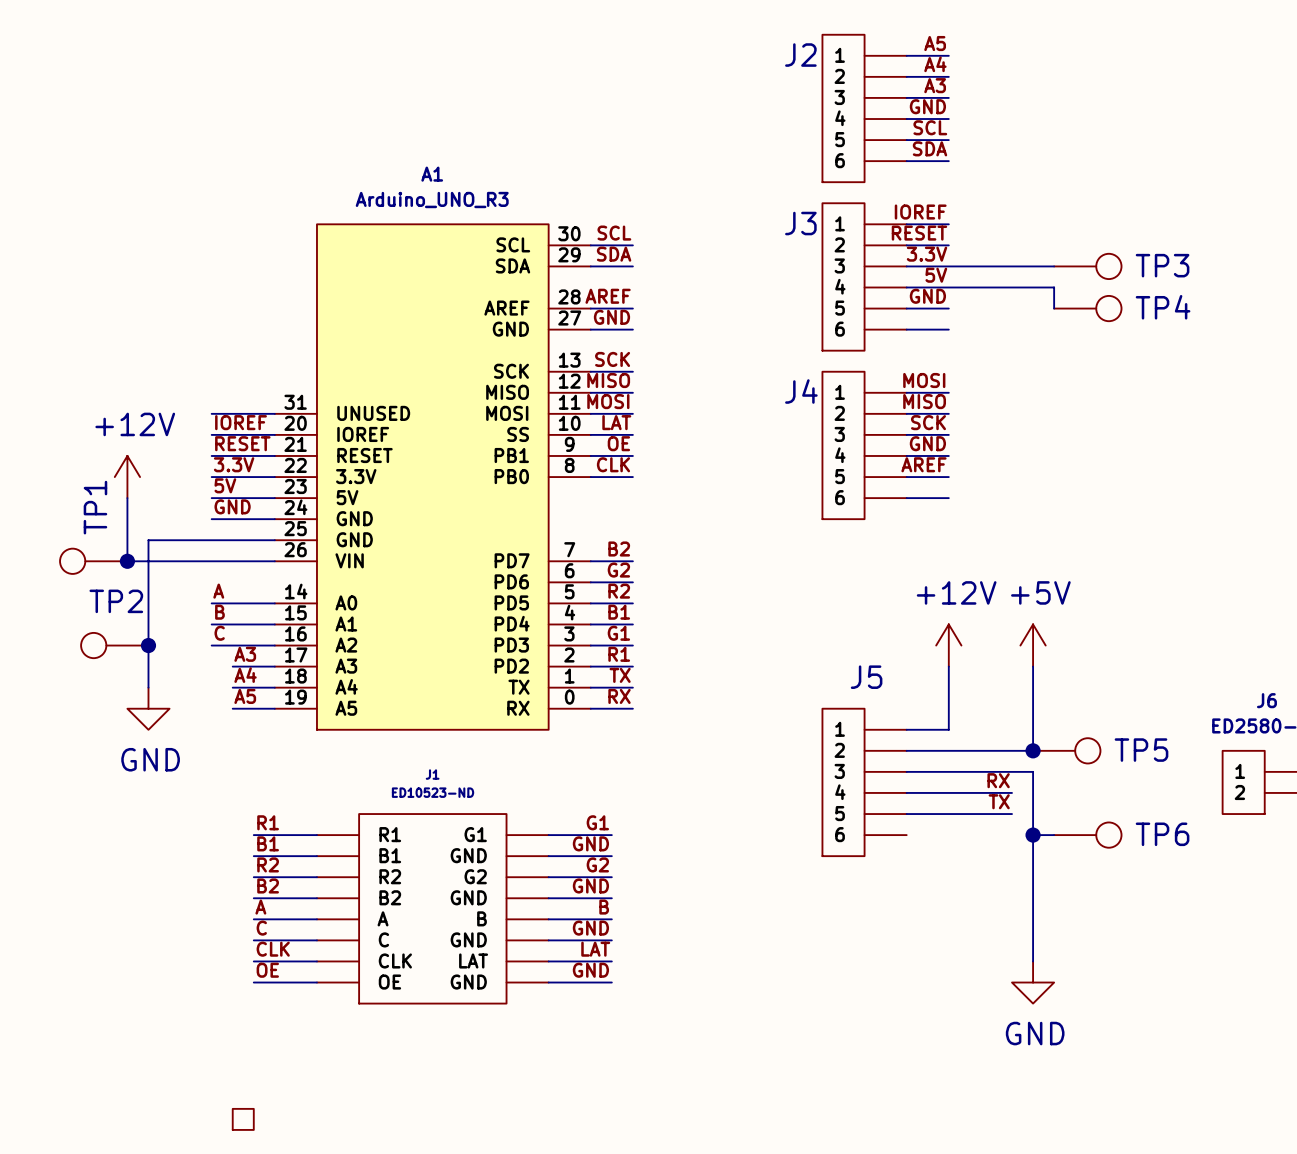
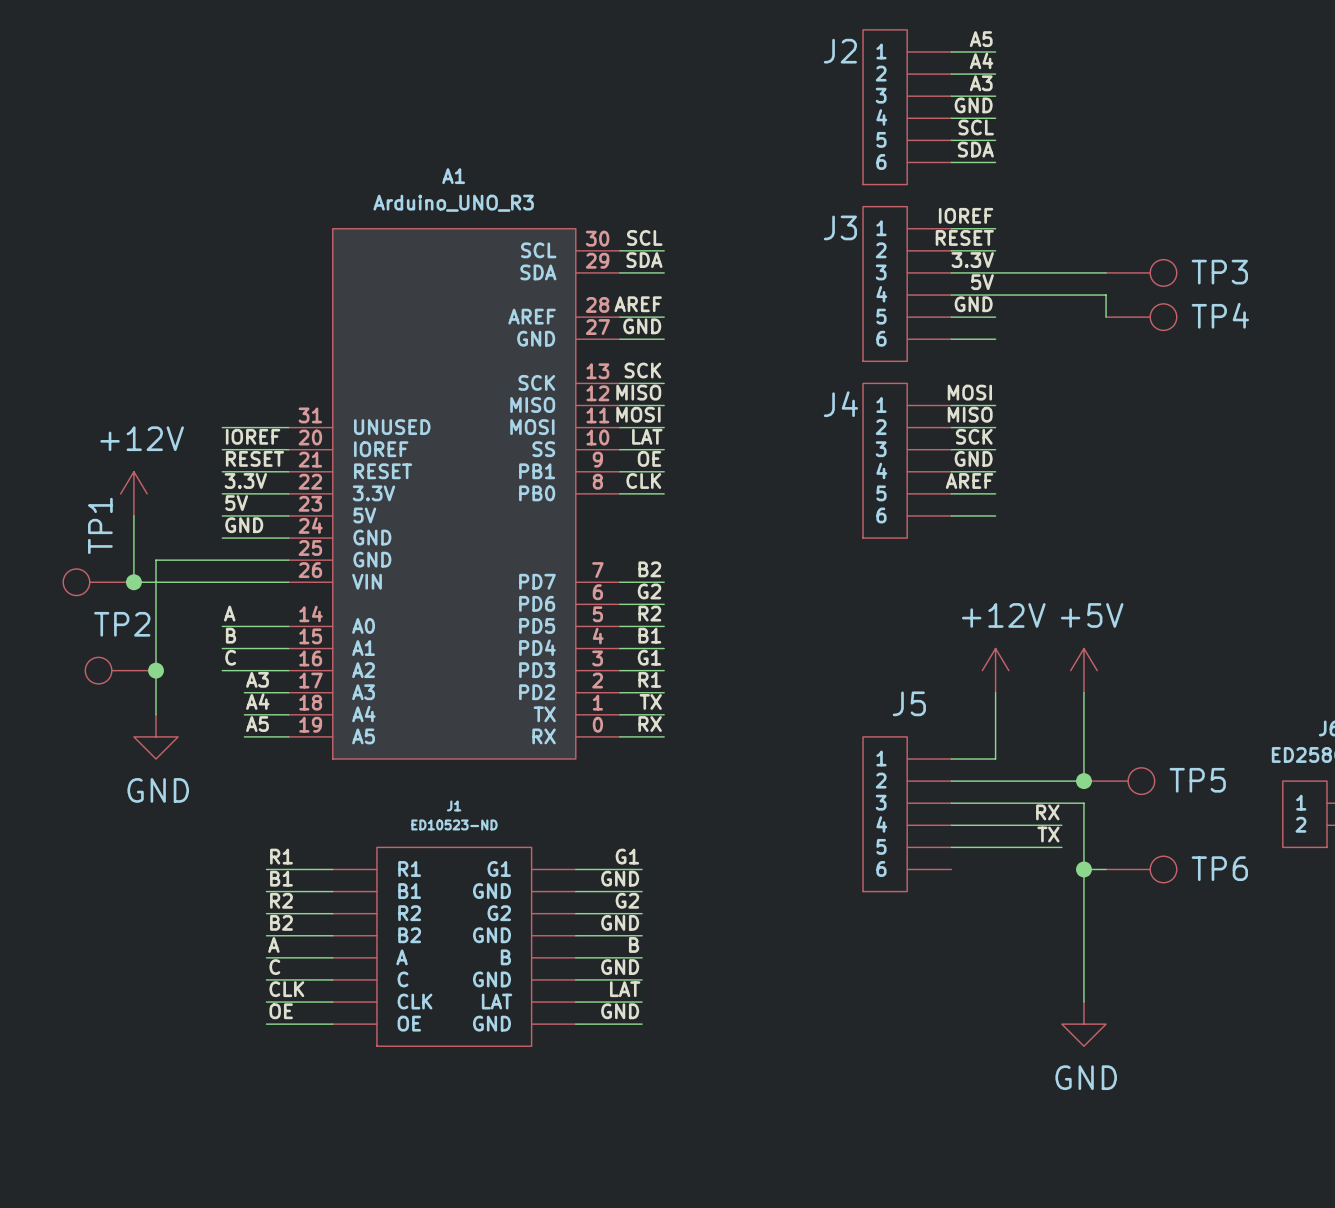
part: (243, 1119) -> none

